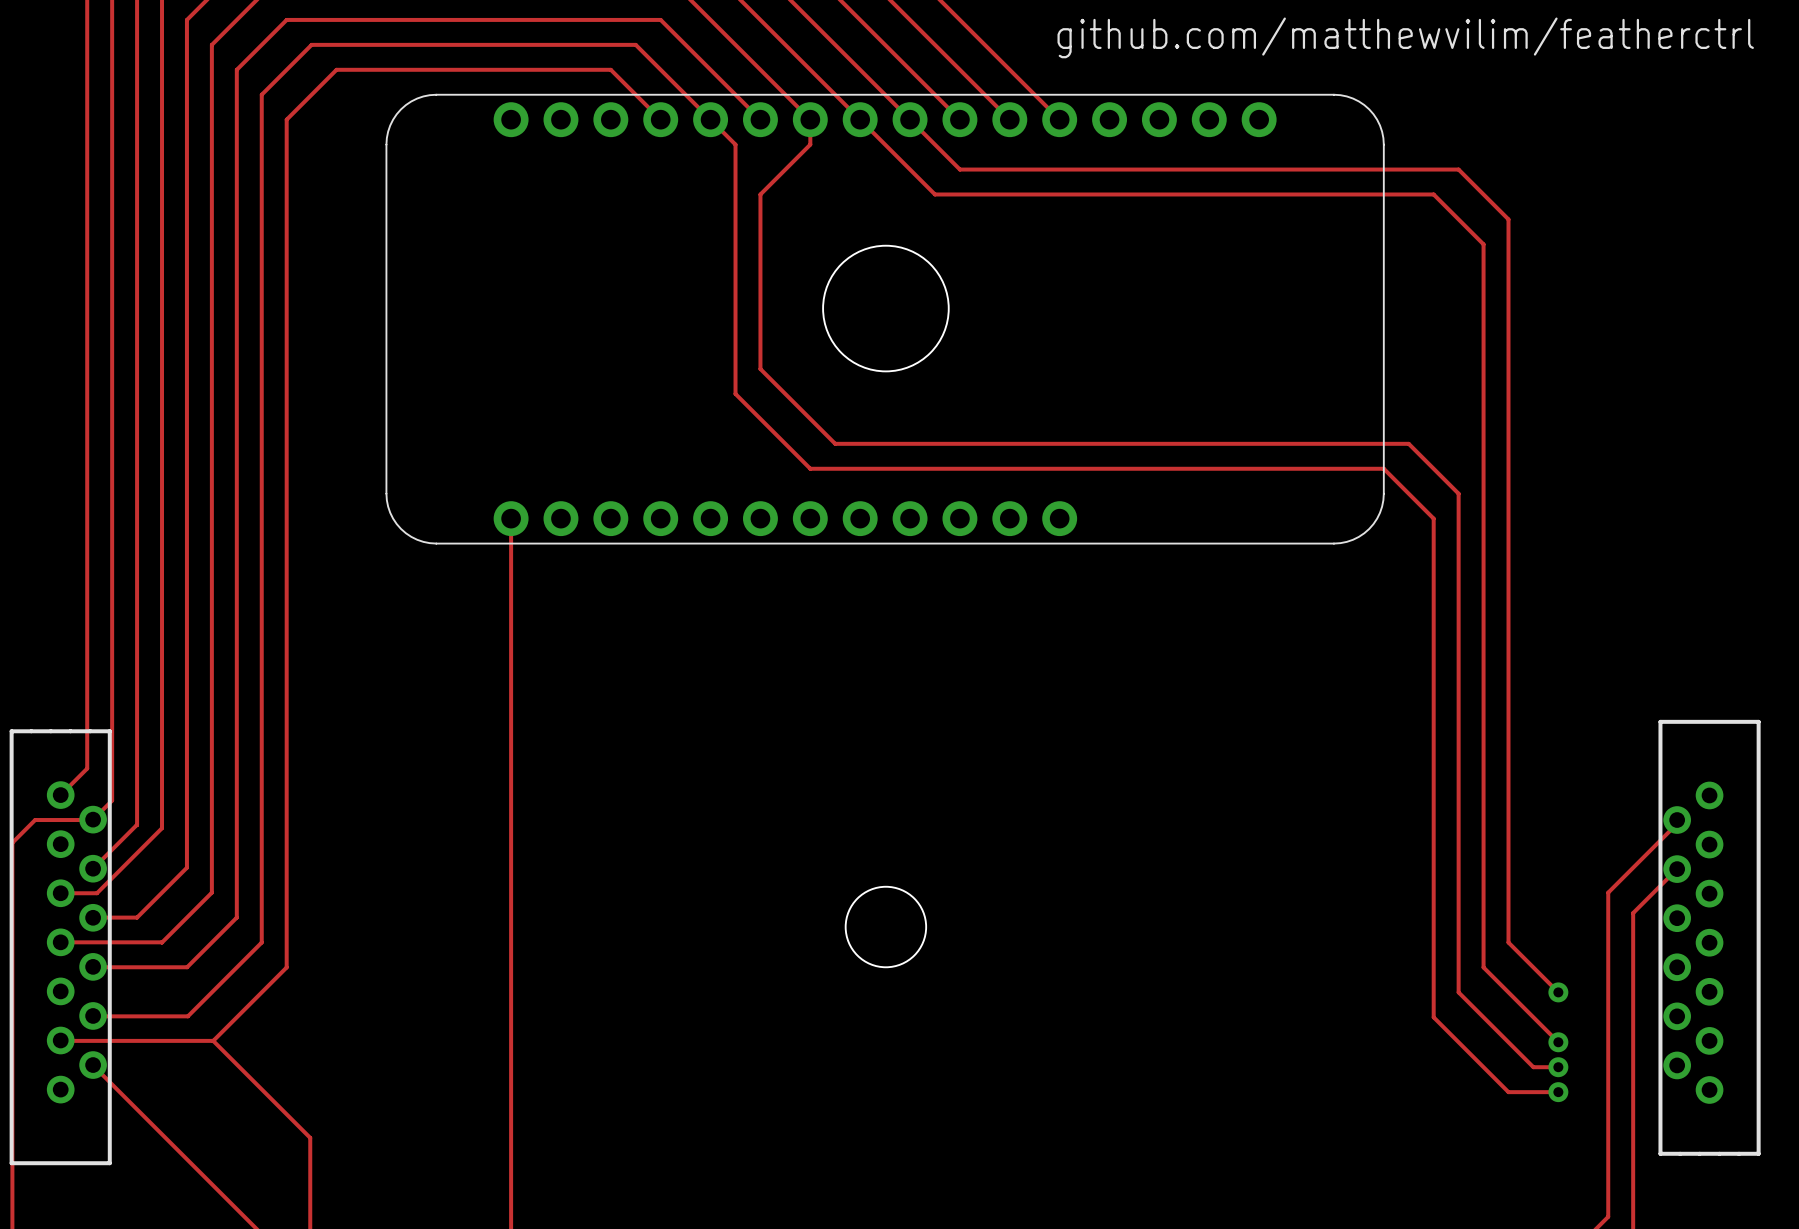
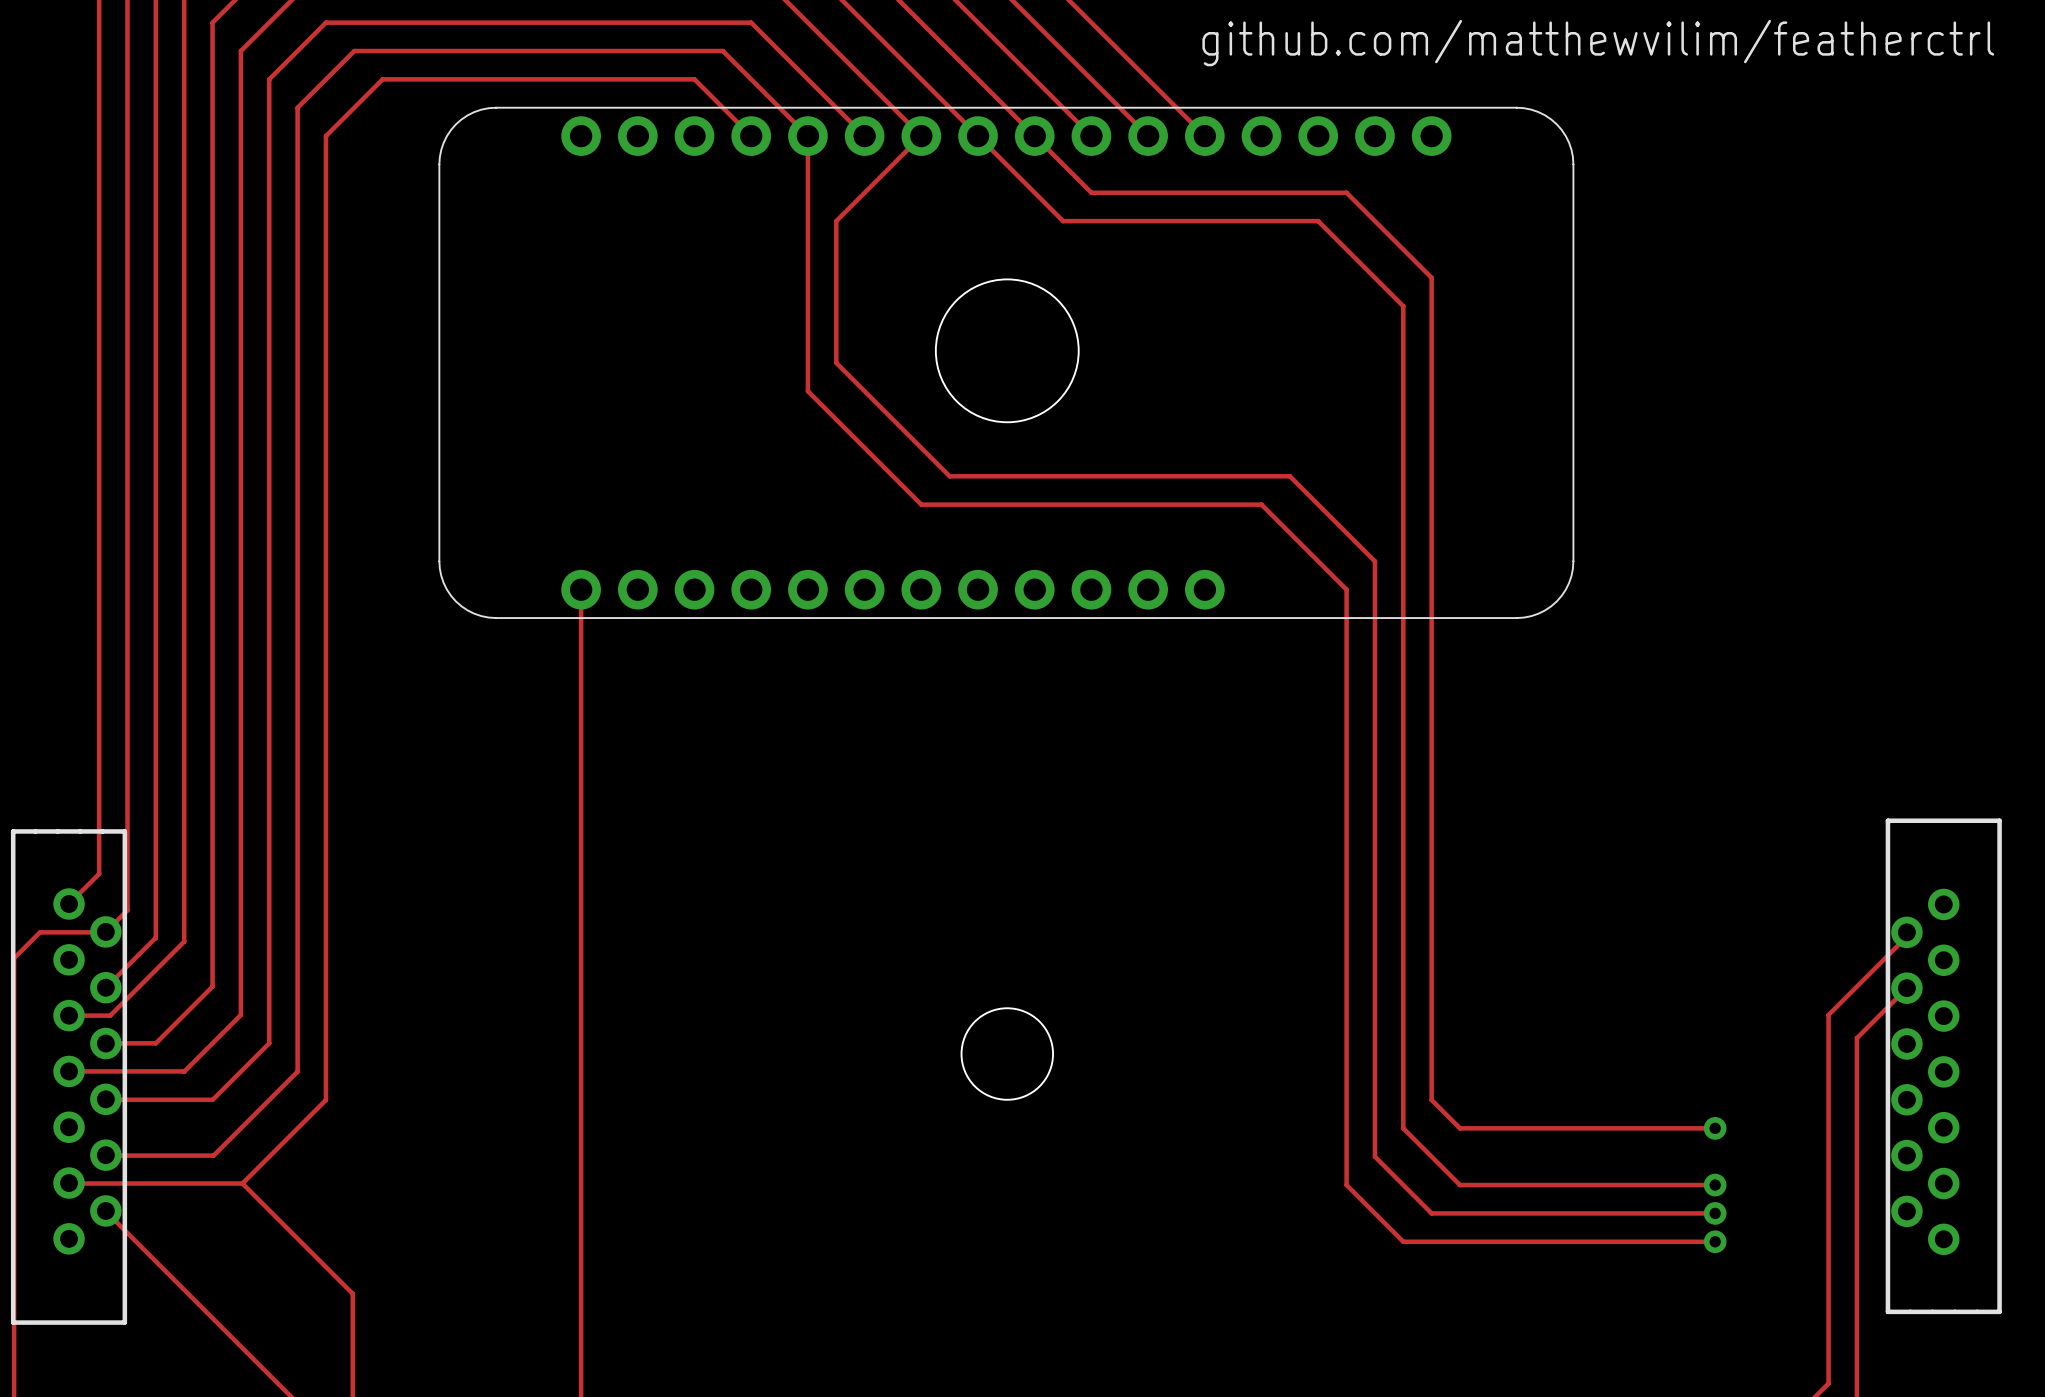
track: (710, 119) (735, 144) (735, 194) -> (921, 136) (836, 221)
track: (810, 119) (810, 144) (760, 194) (760, 369) (835, 443) -> (807, 136) (807, 391) (921, 504) (949, 504)
track: (1184, 169) (1458, 169) (1508, 219) (1508, 942) (1558, 992) -> (1346, 192) (1431, 277) (1431, 1100) (1460, 1128) (1715, 1128)
track: (1159, 194) (1433, 194) (1483, 244) (1483, 967) (1558, 1042) -> (1318, 221) (1403, 306) (1403, 1128) (1460, 1185) (1715, 1185)
track: (735, 319) (735, 393) (810, 468) (1383, 468) (1433, 518) (1433, 1017) (1508, 1092) (1558, 1092) -> (836, 362) (949, 476) (1289, 476) (1374, 561) (1374, 1156) (1431, 1213) (1715, 1213)
track: (1109, 443) (1408, 443) (1458, 493) (1458, 992) (1533, 1067) (1558, 1067) -> (1261, 504) (1346, 589) (1346, 1185) (1403, 1241) (1715, 1241)
via: none -> (1715, 1128)
via: (1558, 992) -> none
via: none -> (1715, 1185)
via: (1558, 1042) -> none
via: none -> (1715, 1213)
via: (1558, 1067) -> none
via: none -> (1715, 1241)
via: (1558, 1092) -> none

